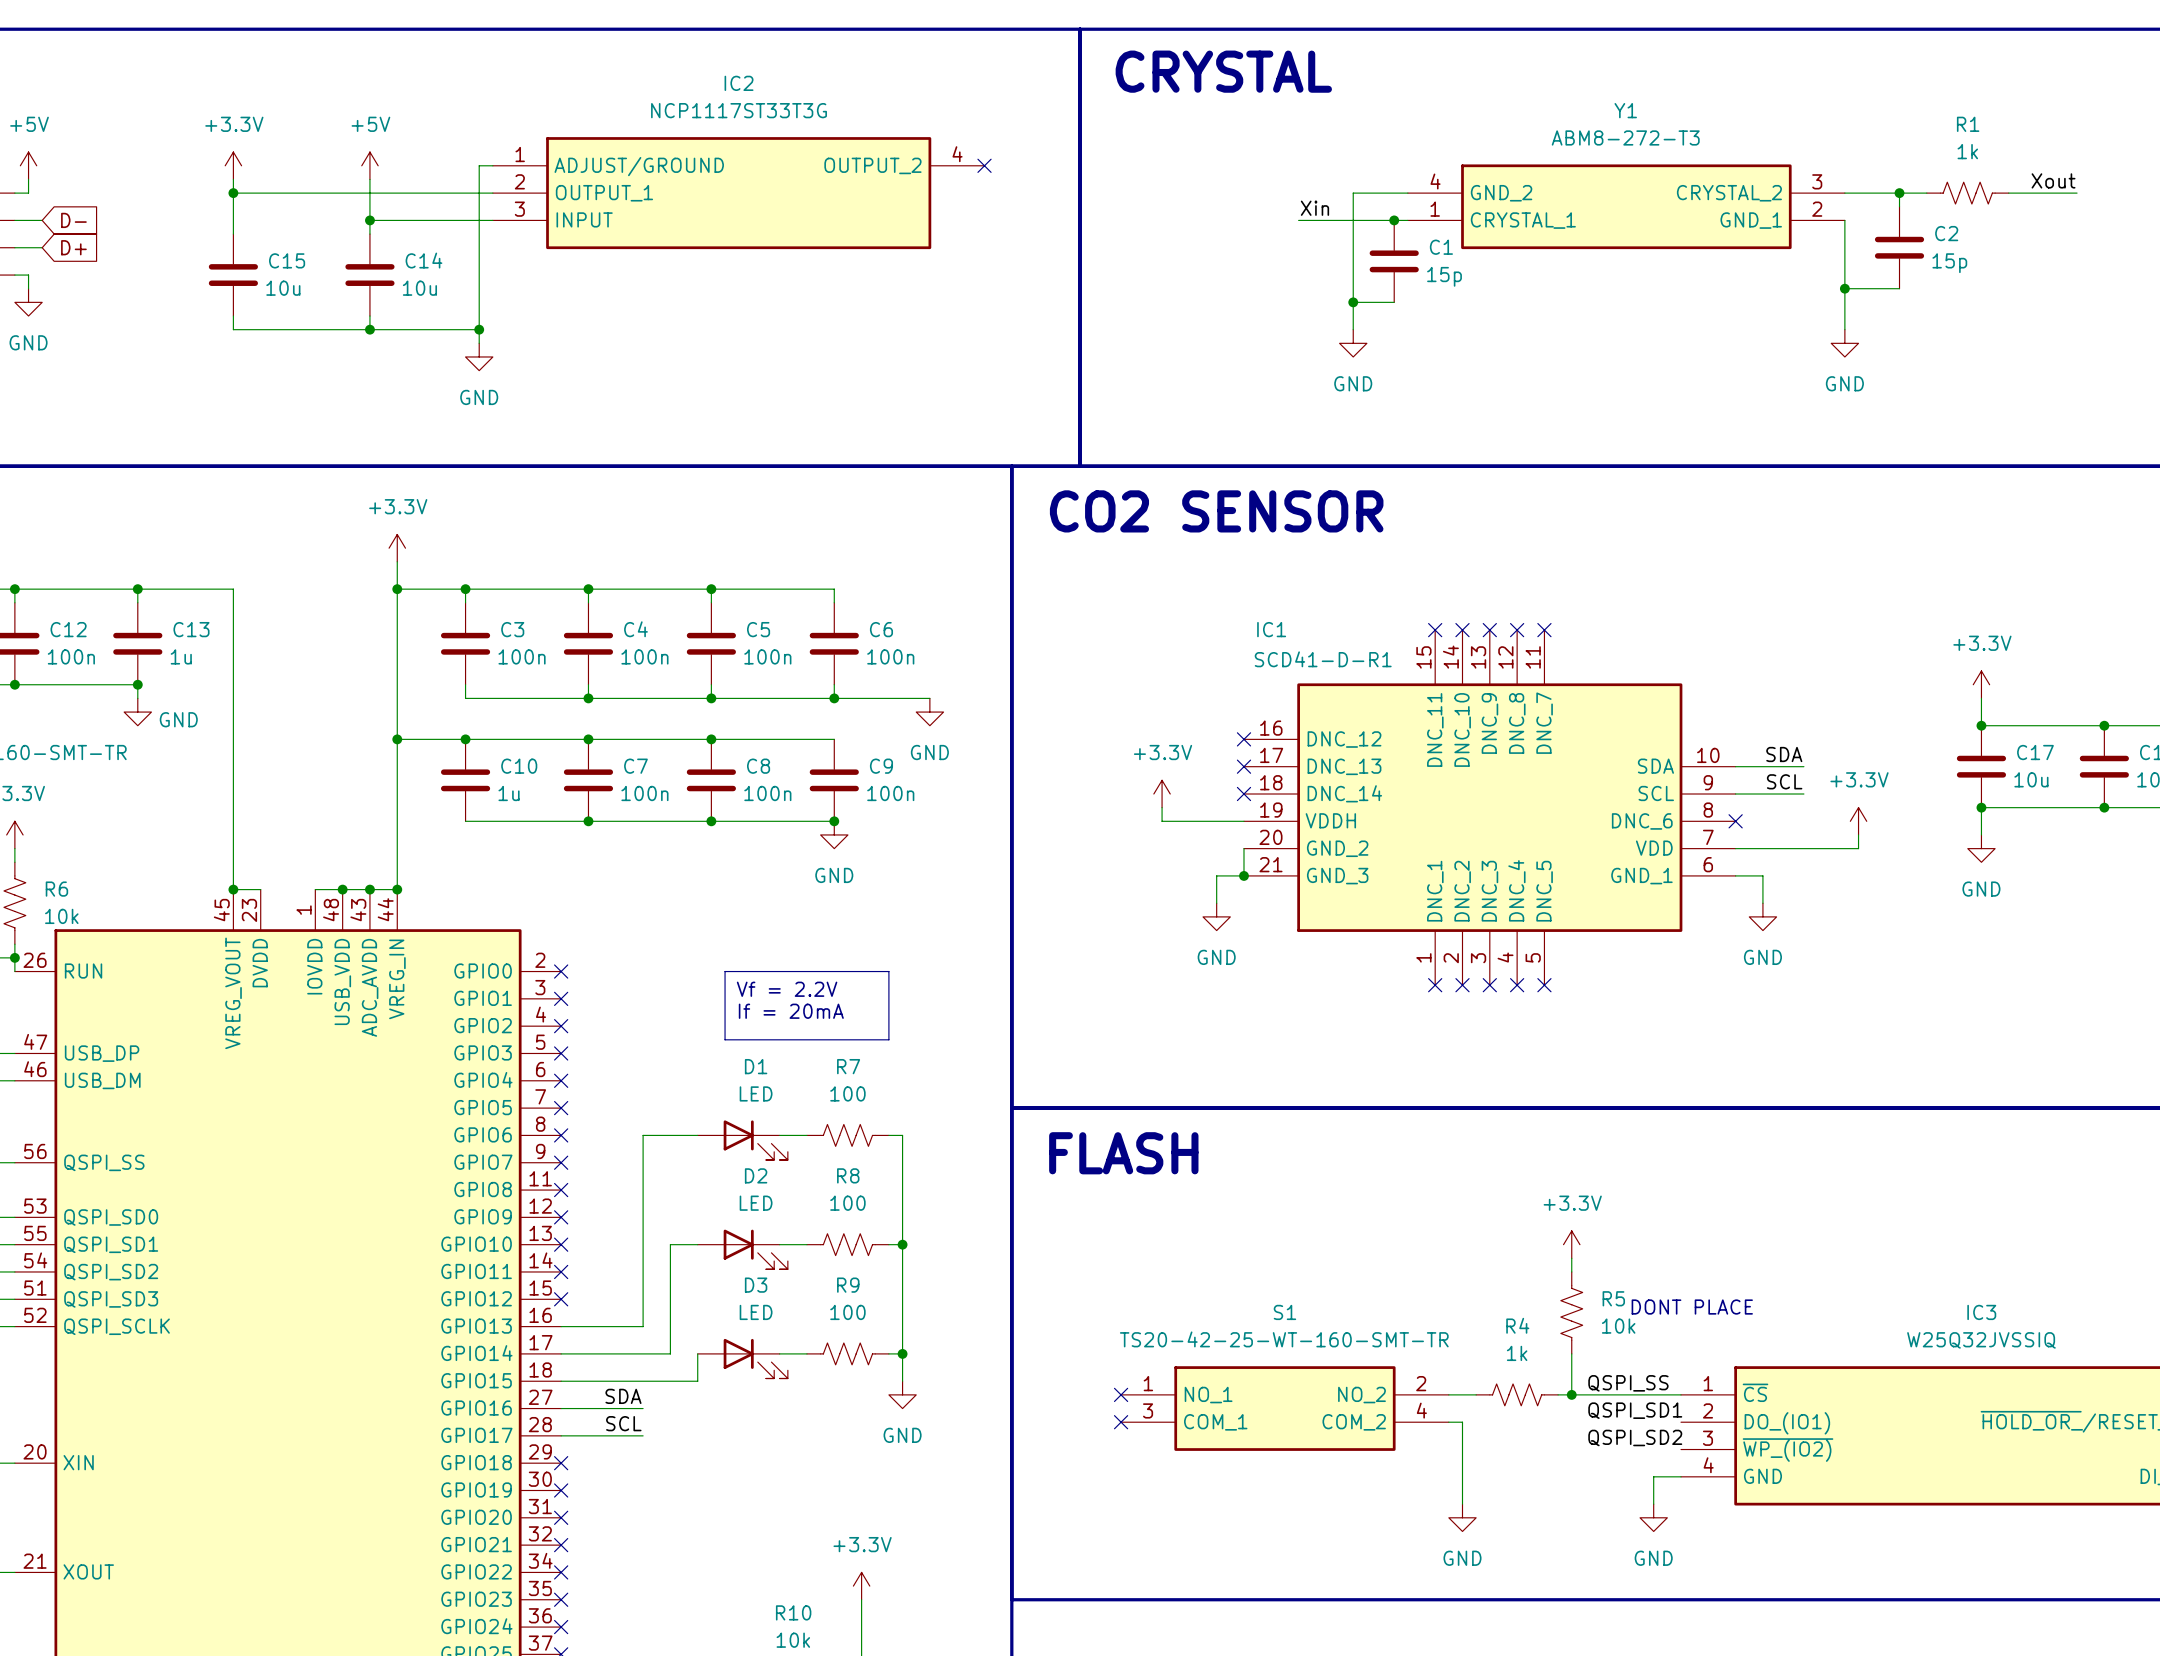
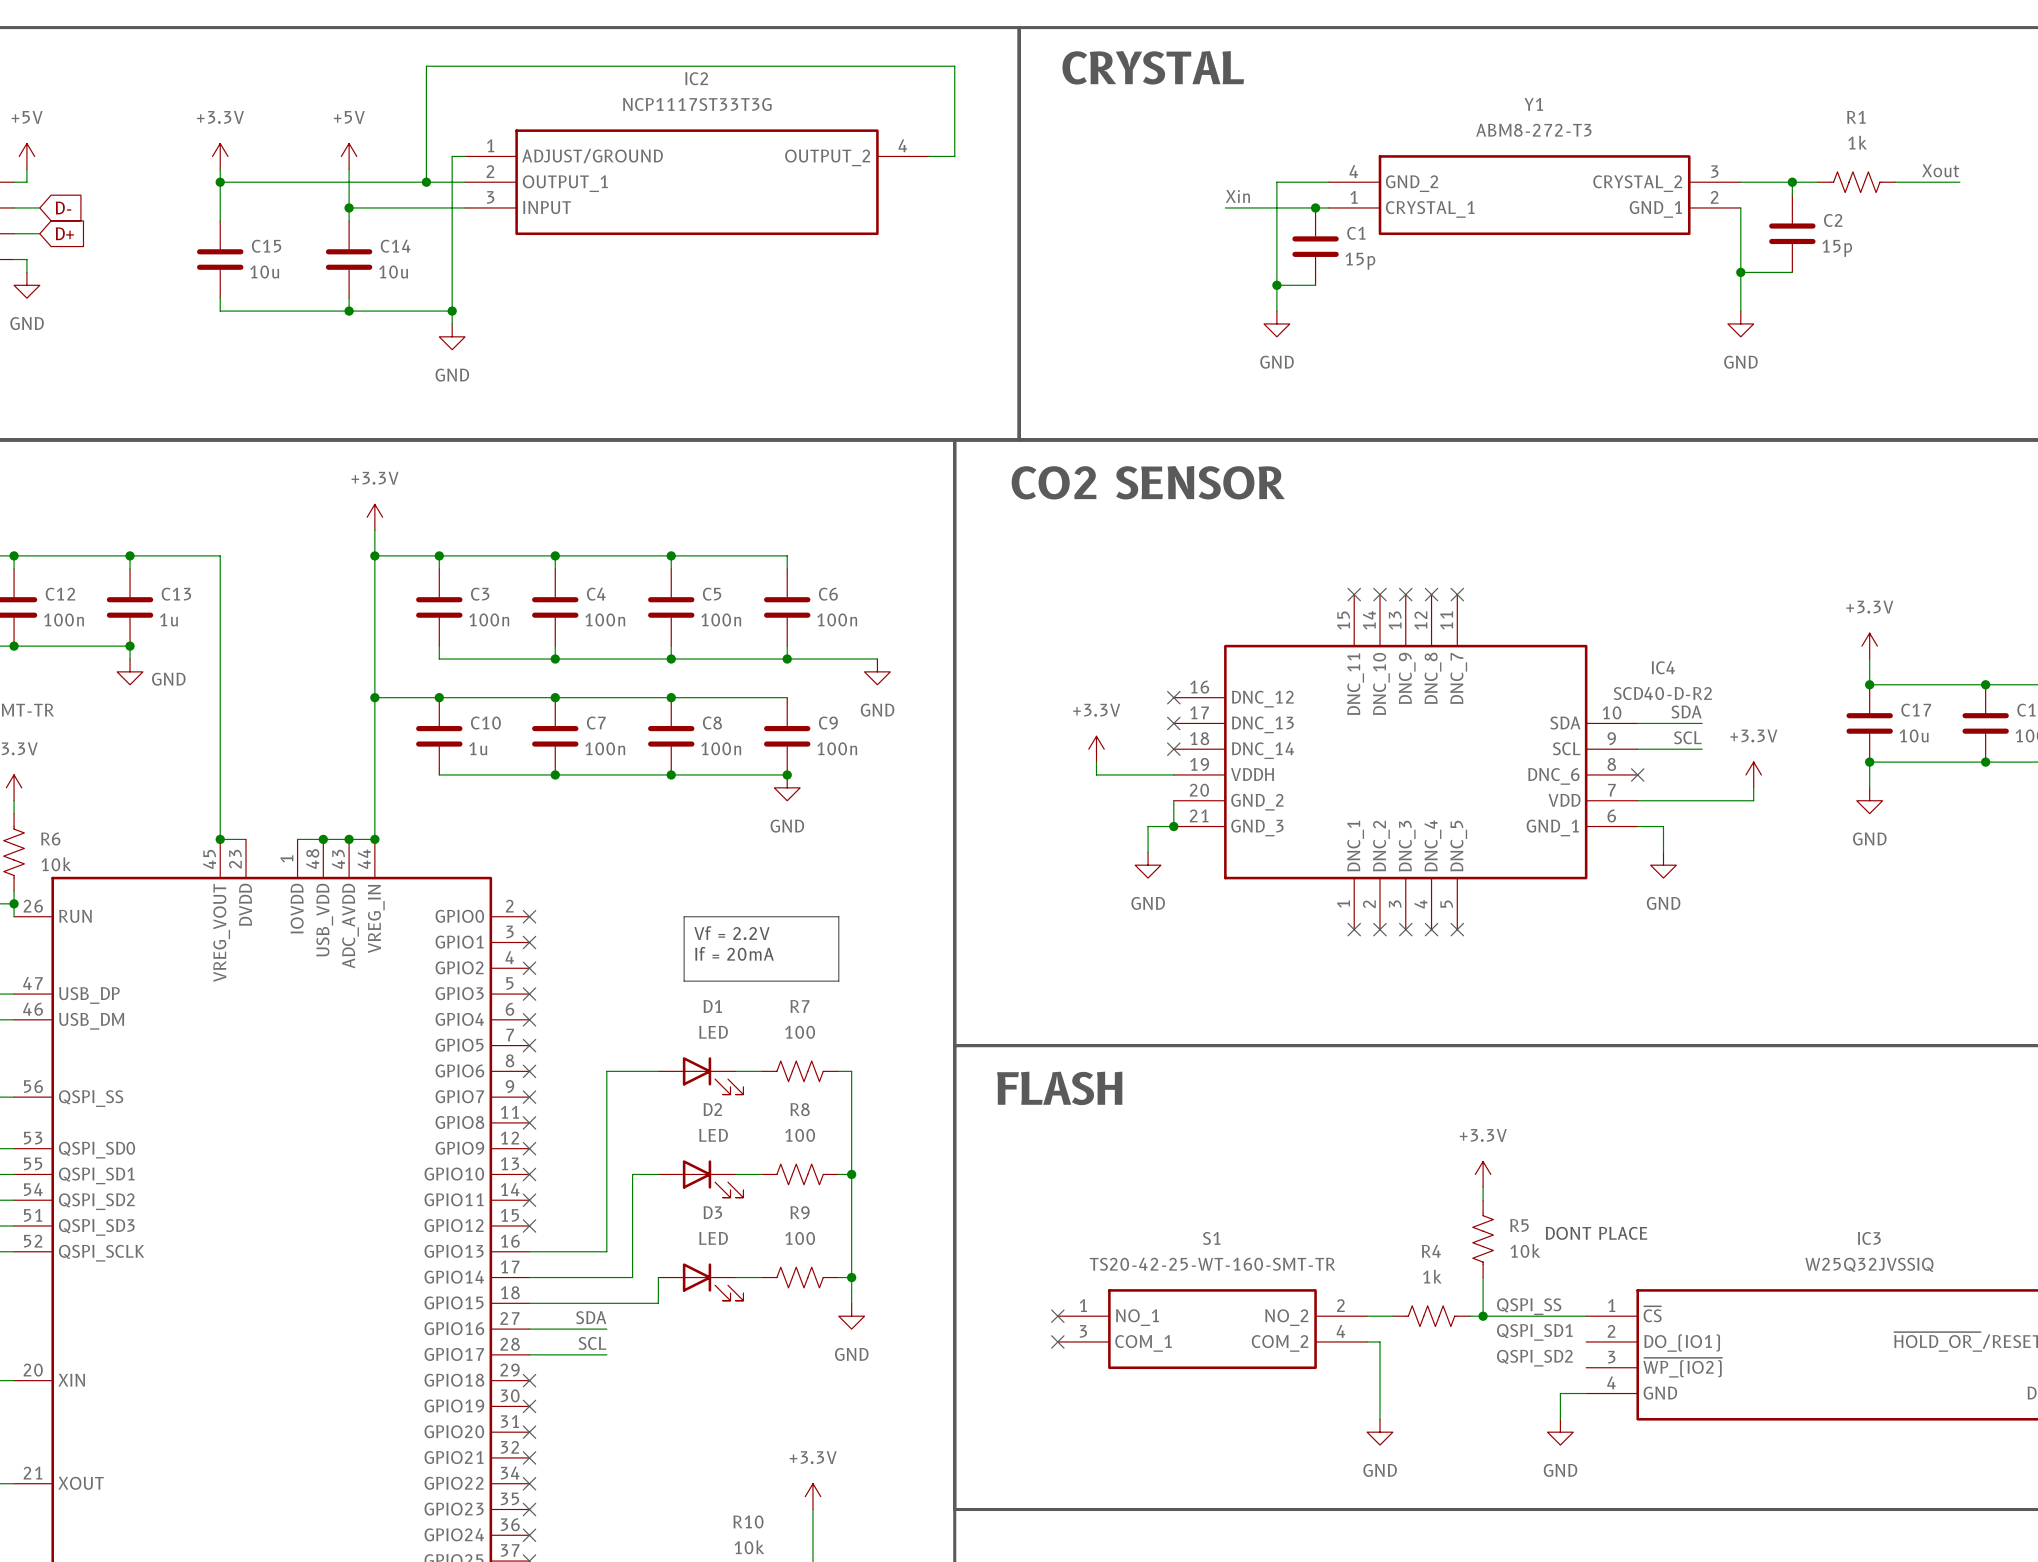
wire: none -> (928, 156) (954, 156) (954, 66) (426, 66) (426, 182)
no-connect mark: (984, 165) -> none
junction: none -> (426, 182)
IC1 name: IC1 (1271, 629) -> IC4 (1663, 667)
IC1 value: SCD41-D-R1 (1323, 659) -> SCD40-D-R2 (1662, 693)

